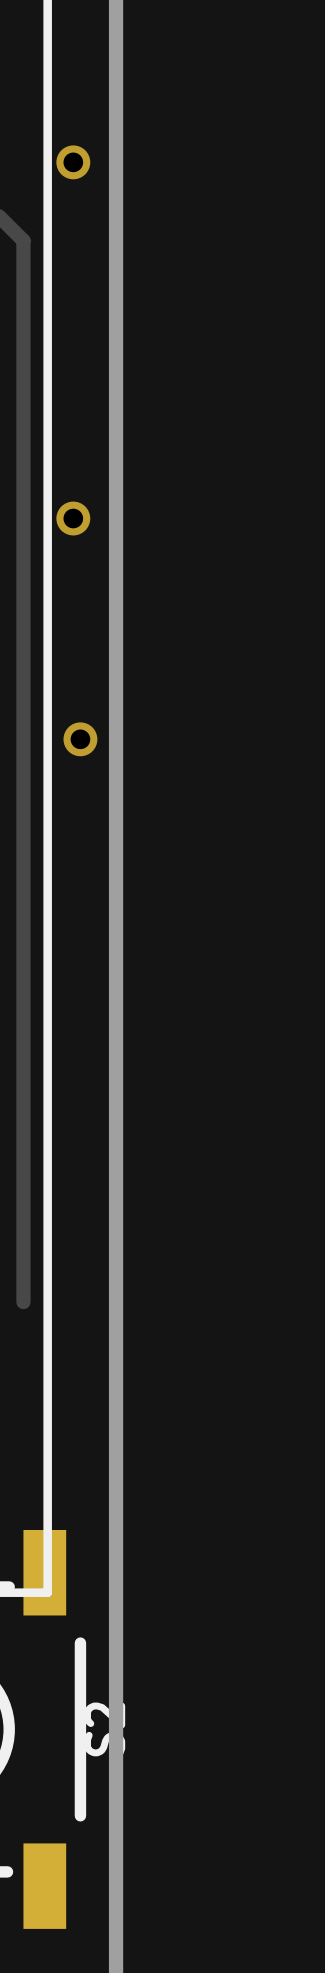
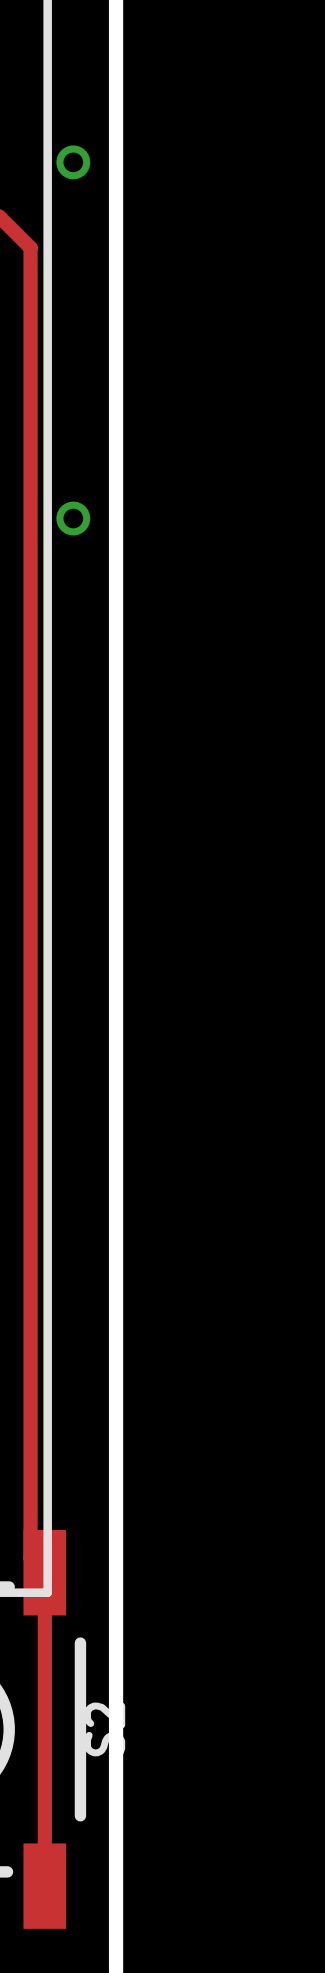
track: (23, 240) (23, 1302) -> (23, 240) (30, 247) (30, 1558) (44, 1572) (44, 1886)
via: (80, 739) -> none

